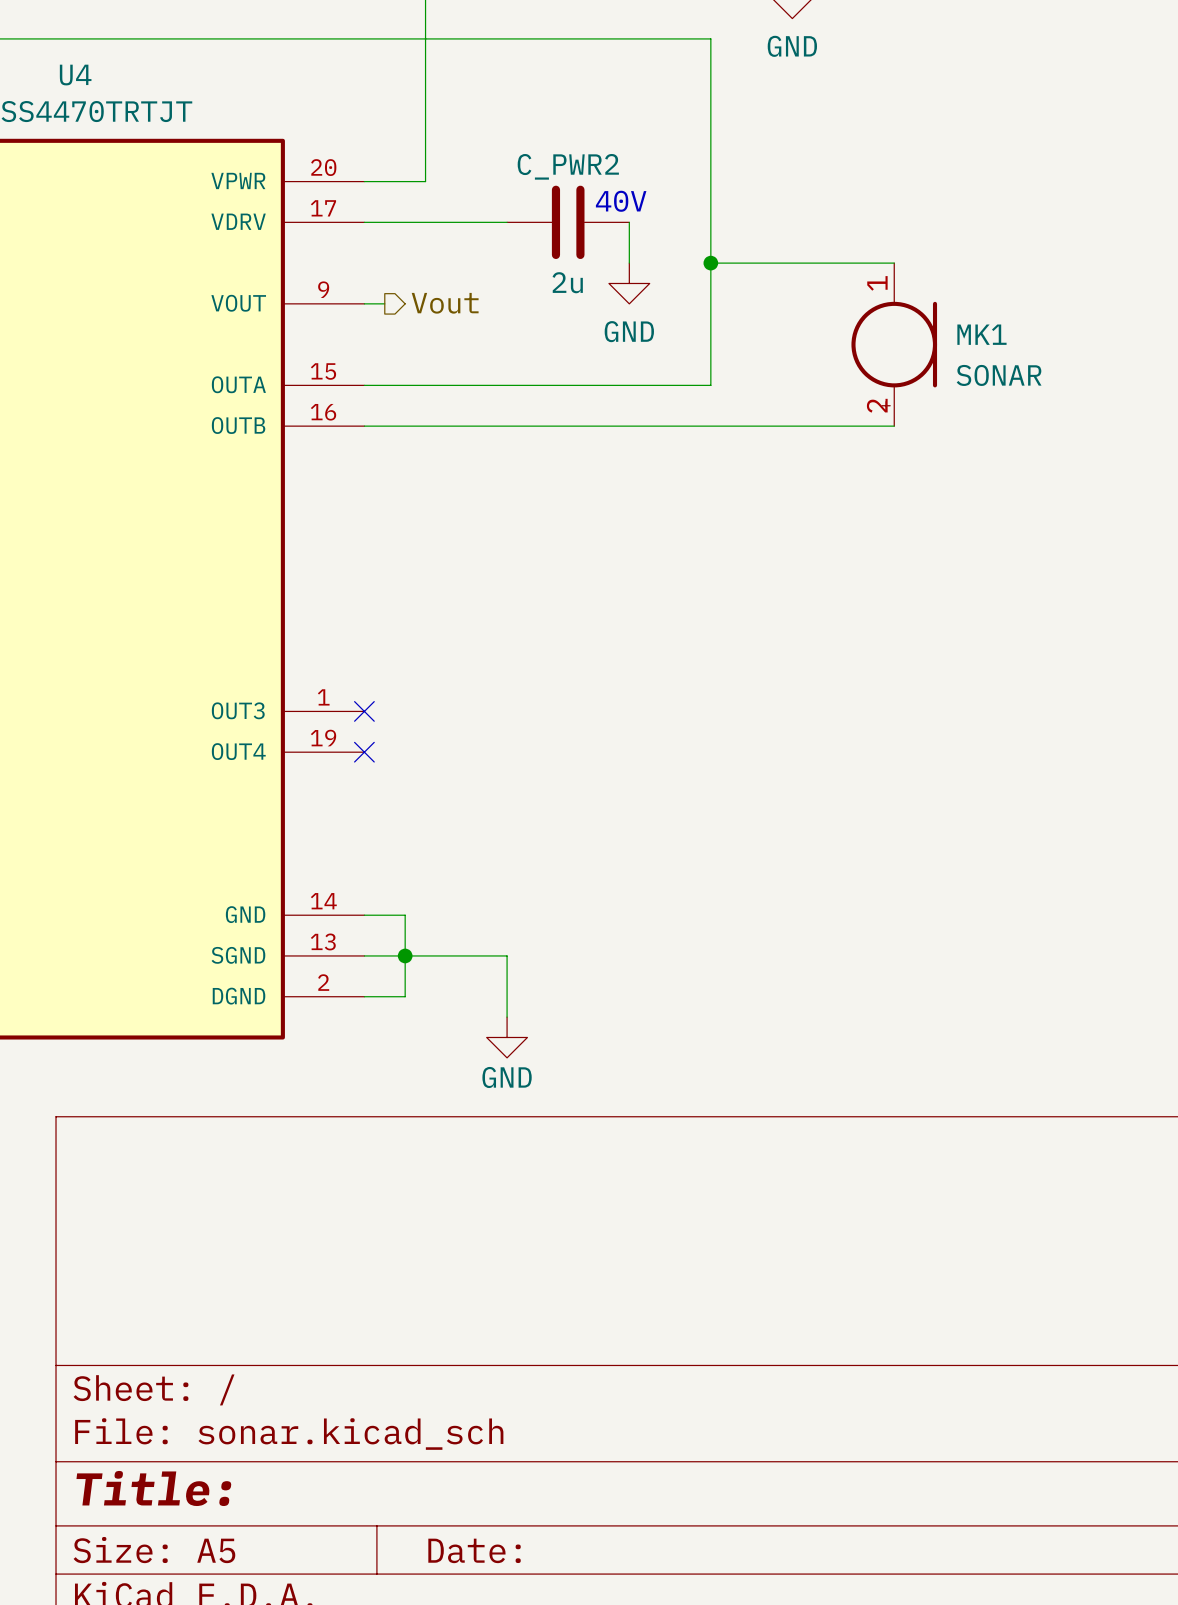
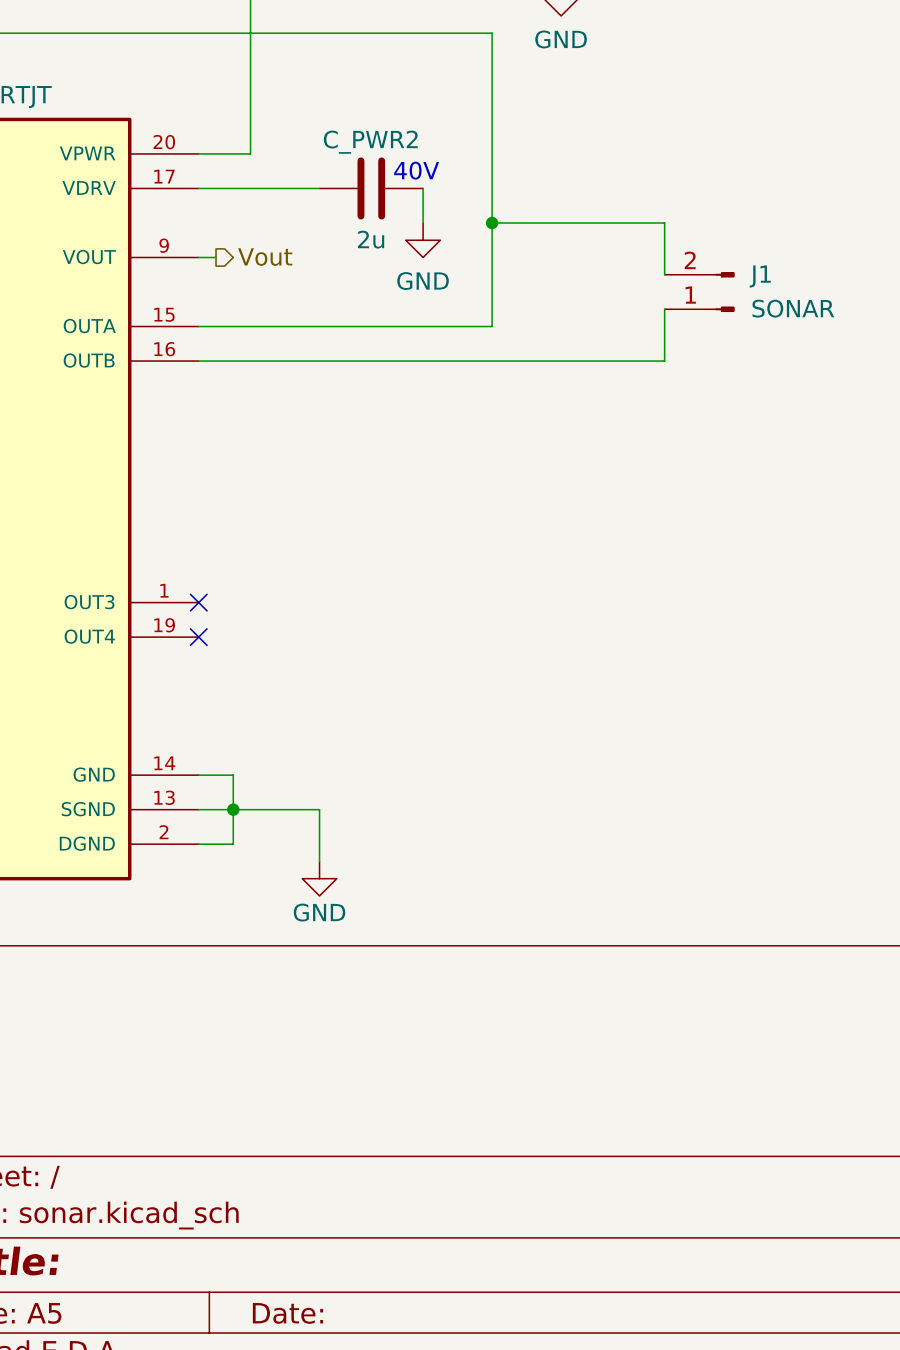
wire: none -> (647, 222) (664, 222) (664, 274)
MK1: SONAR (894, 344) -> none
J1: none -> SONAR (699, 292)
wire: none -> (664, 309) (664, 361) (647, 361)

